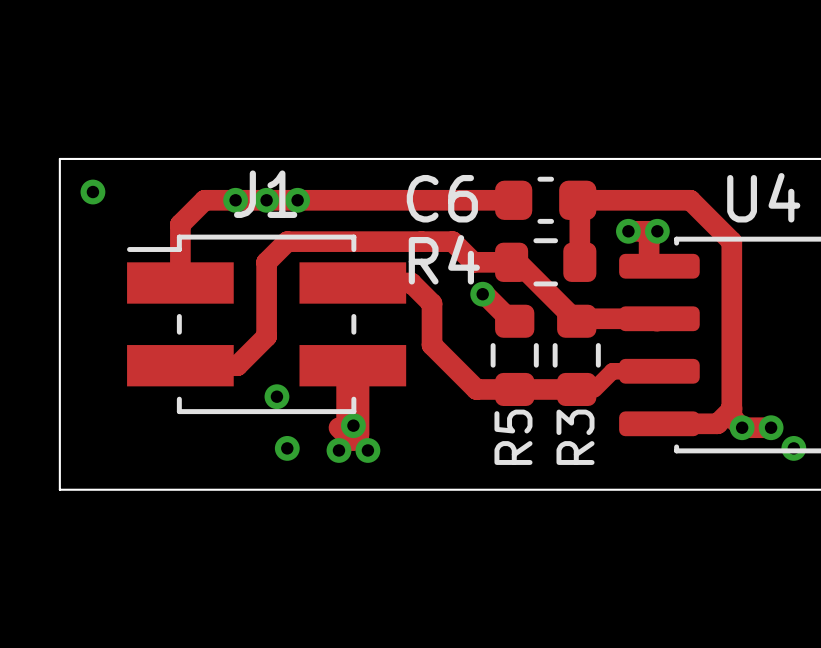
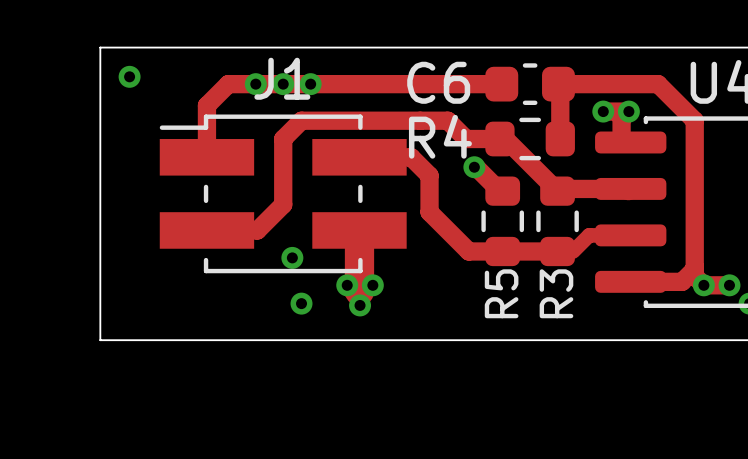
via: (353, 425) -> none
via: none -> (347, 285)
via: none -> (372, 285)
via: (338, 450) -> none
via: none -> (360, 305)
via: (367, 450) -> none

